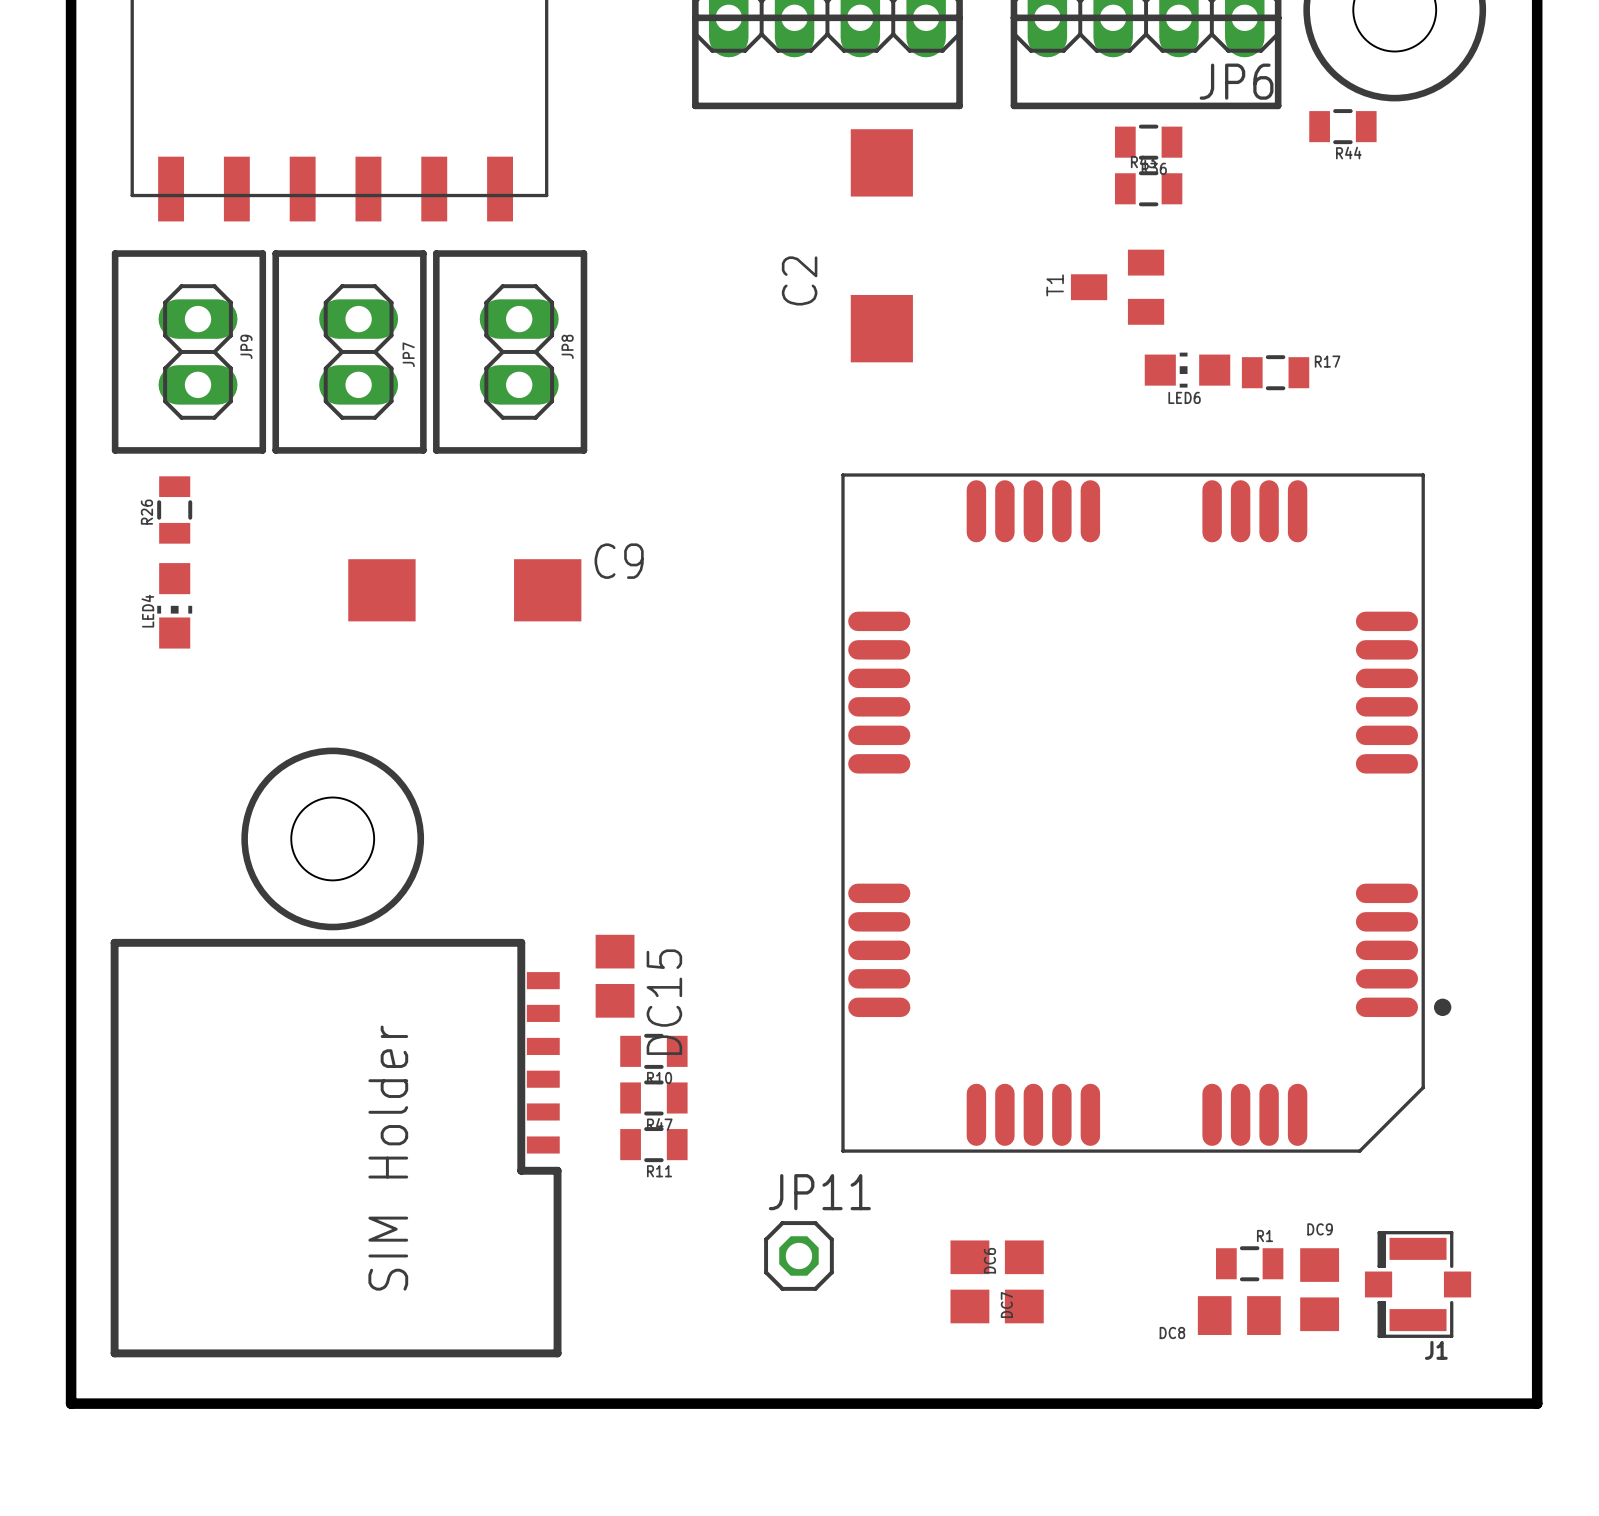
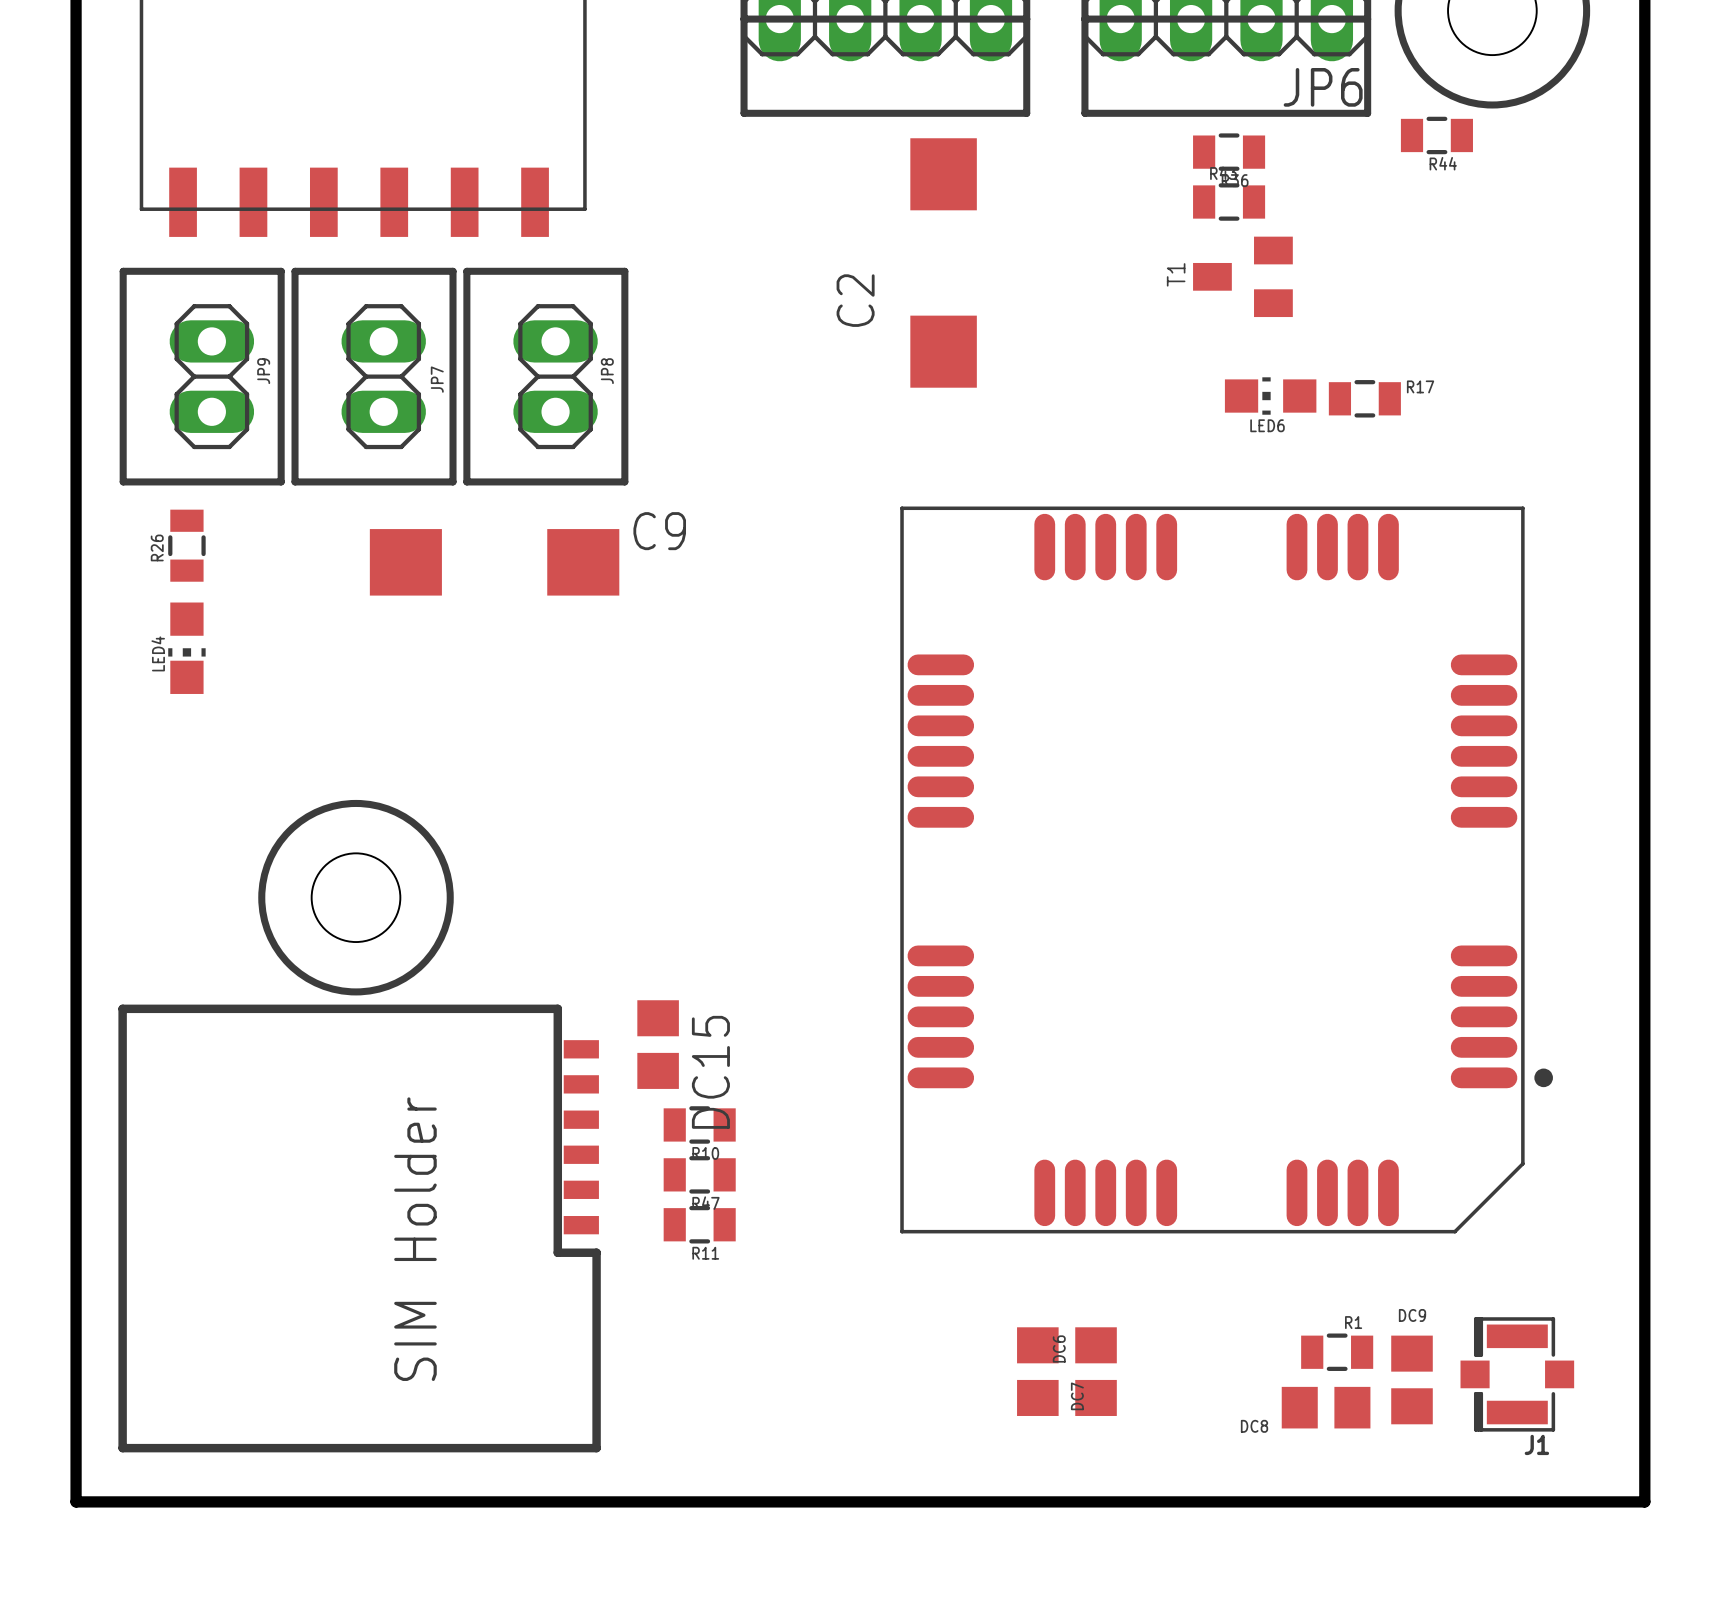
T1 position: (1117, 287) -> (1242, 276)
C9 position: (464, 590) -> (494, 562)
JP11: (798, 1255) -> none

